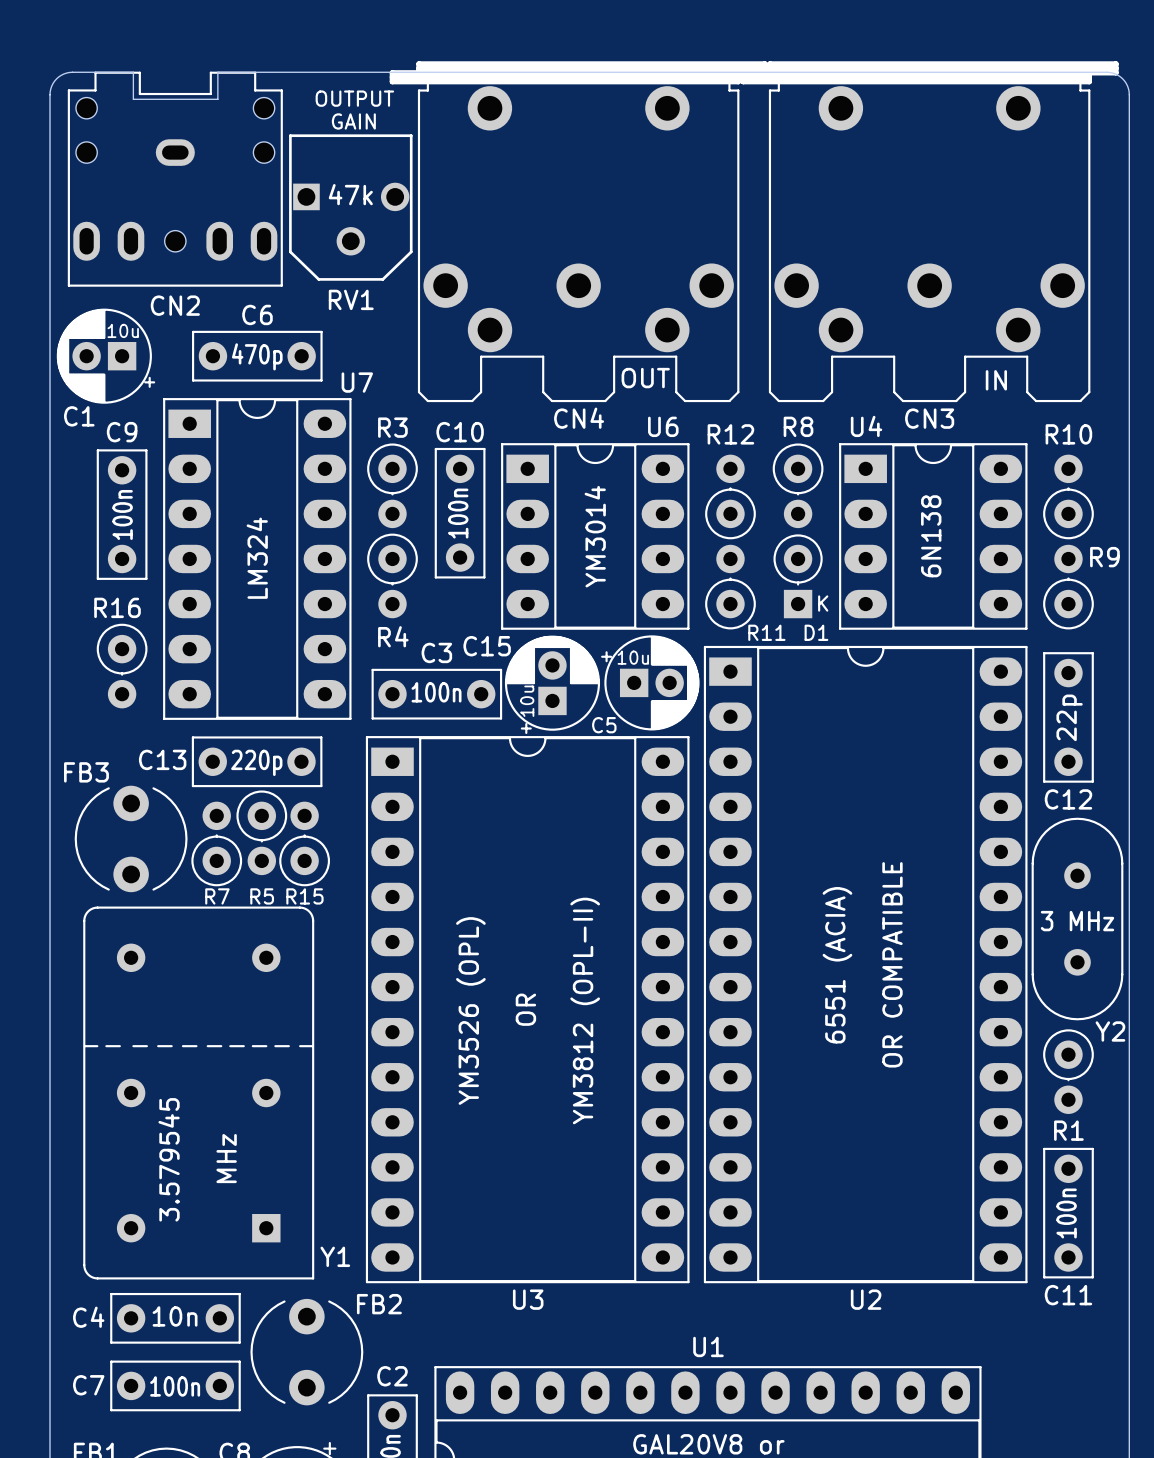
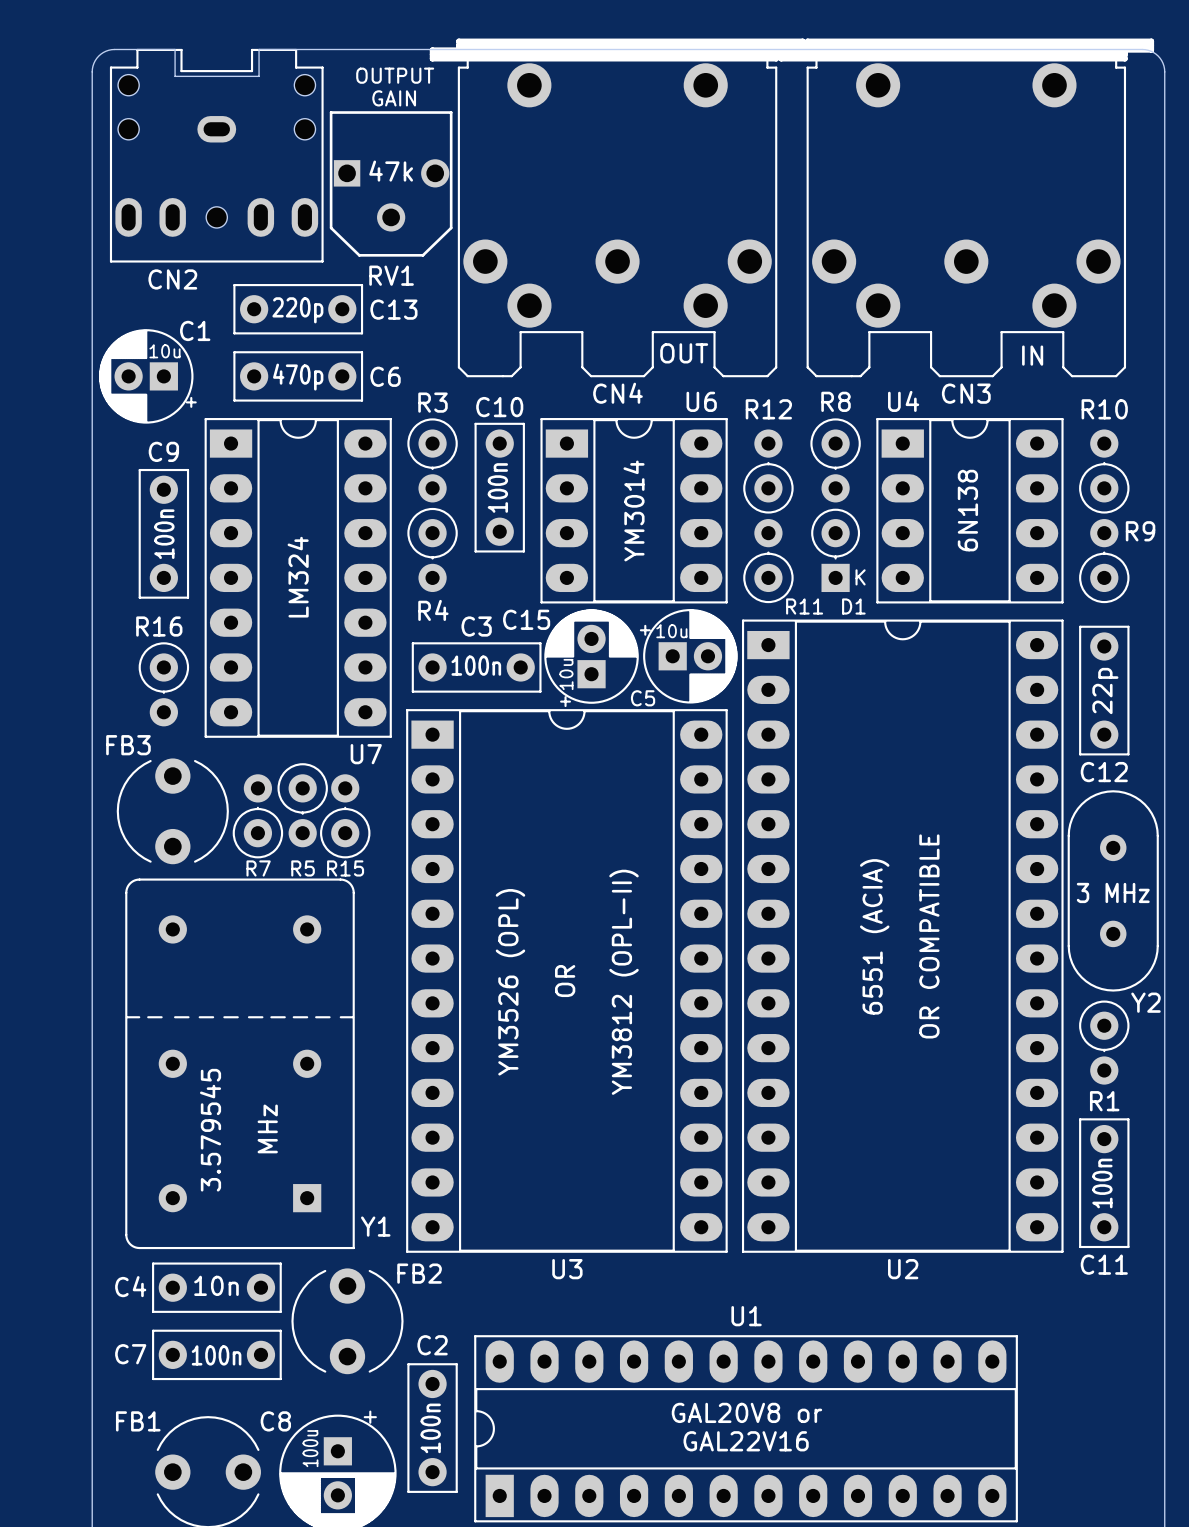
CN2 name position: CN2 (175, 305) -> CN2 (172, 279)
C6 name position: C6 (257, 314) -> C6 (385, 376)
C1 position: (106, 356) -> (147, 376)
C6 position: (257, 356) -> (298, 376)
U7 name position: U7 (357, 382) -> U7 (366, 754)
C1 name position: C1 (79, 416) -> C1 (195, 330)
C9 position: (122, 514) -> (163, 533)
U7 position: (257, 558) -> (298, 577)
R16 position: (122, 666) -> (163, 684)
C13 name position: C13 (162, 759) -> C13 (393, 309)
C13 position: (257, 761) -> (298, 309)

